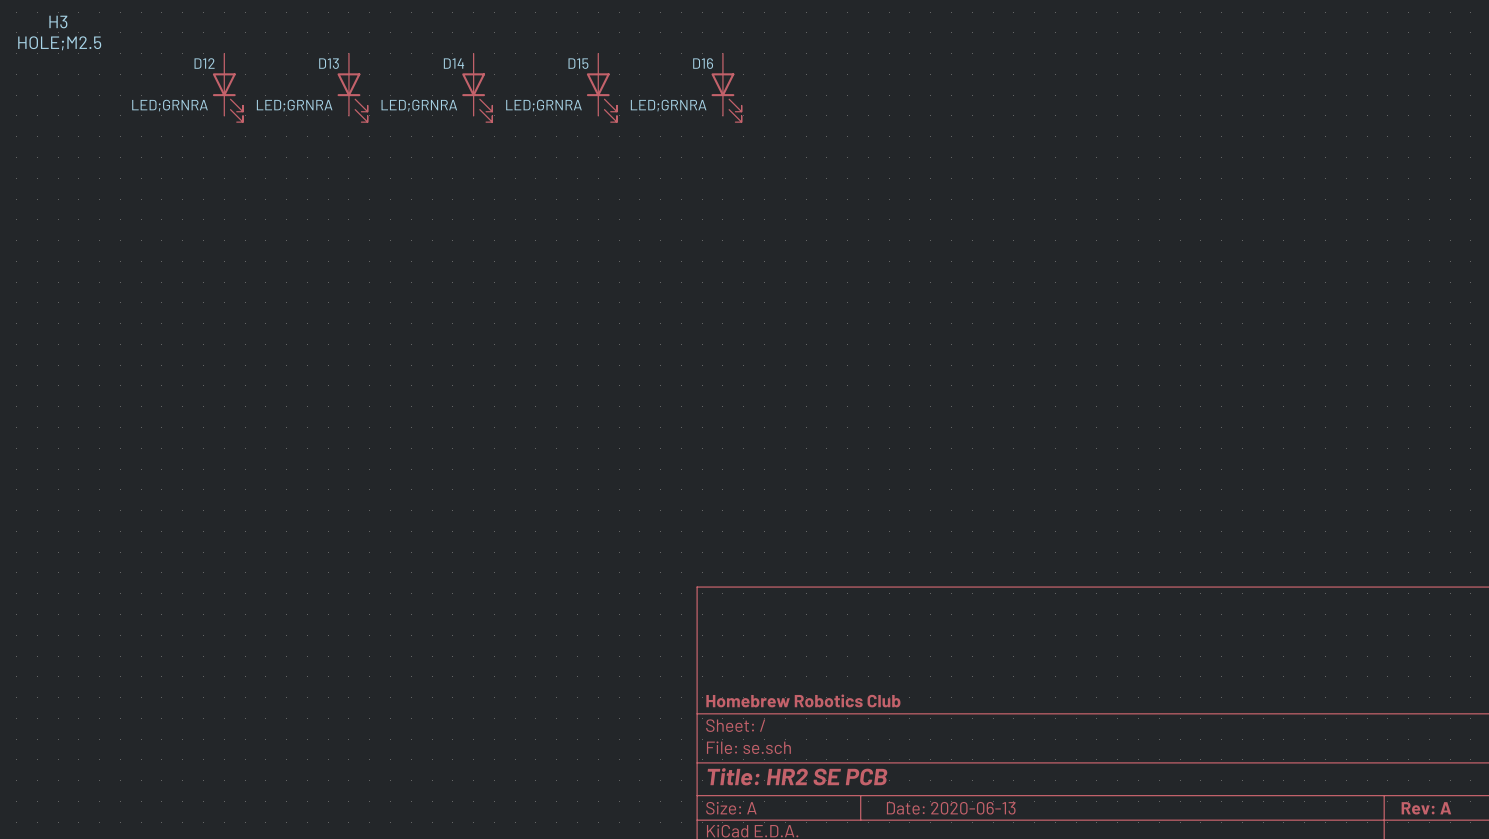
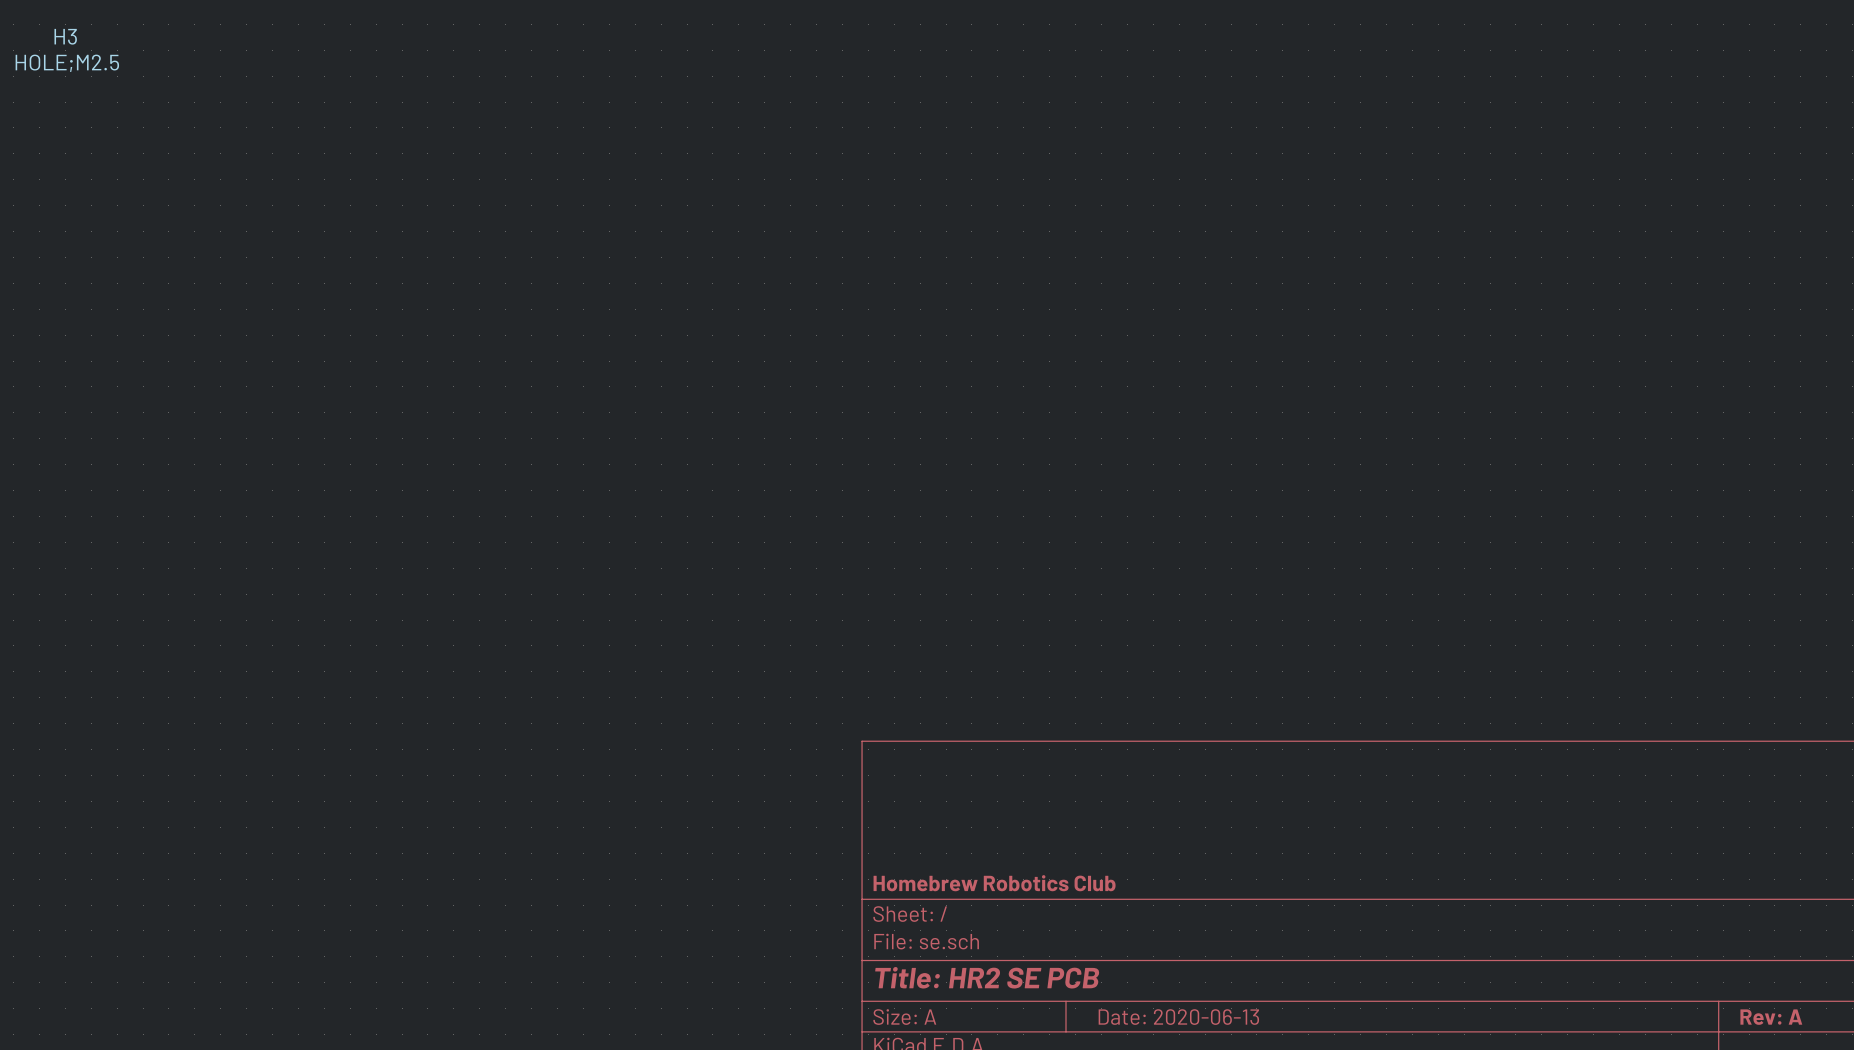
D12: LED;GRNRA (227, 87) -> none
D13: LED;GRNRA (352, 87) -> none
D14: LED;GRNRA (477, 87) -> none
D15: LED;GRNRA (601, 87) -> none
D16: LED;GRNRA (726, 87) -> none

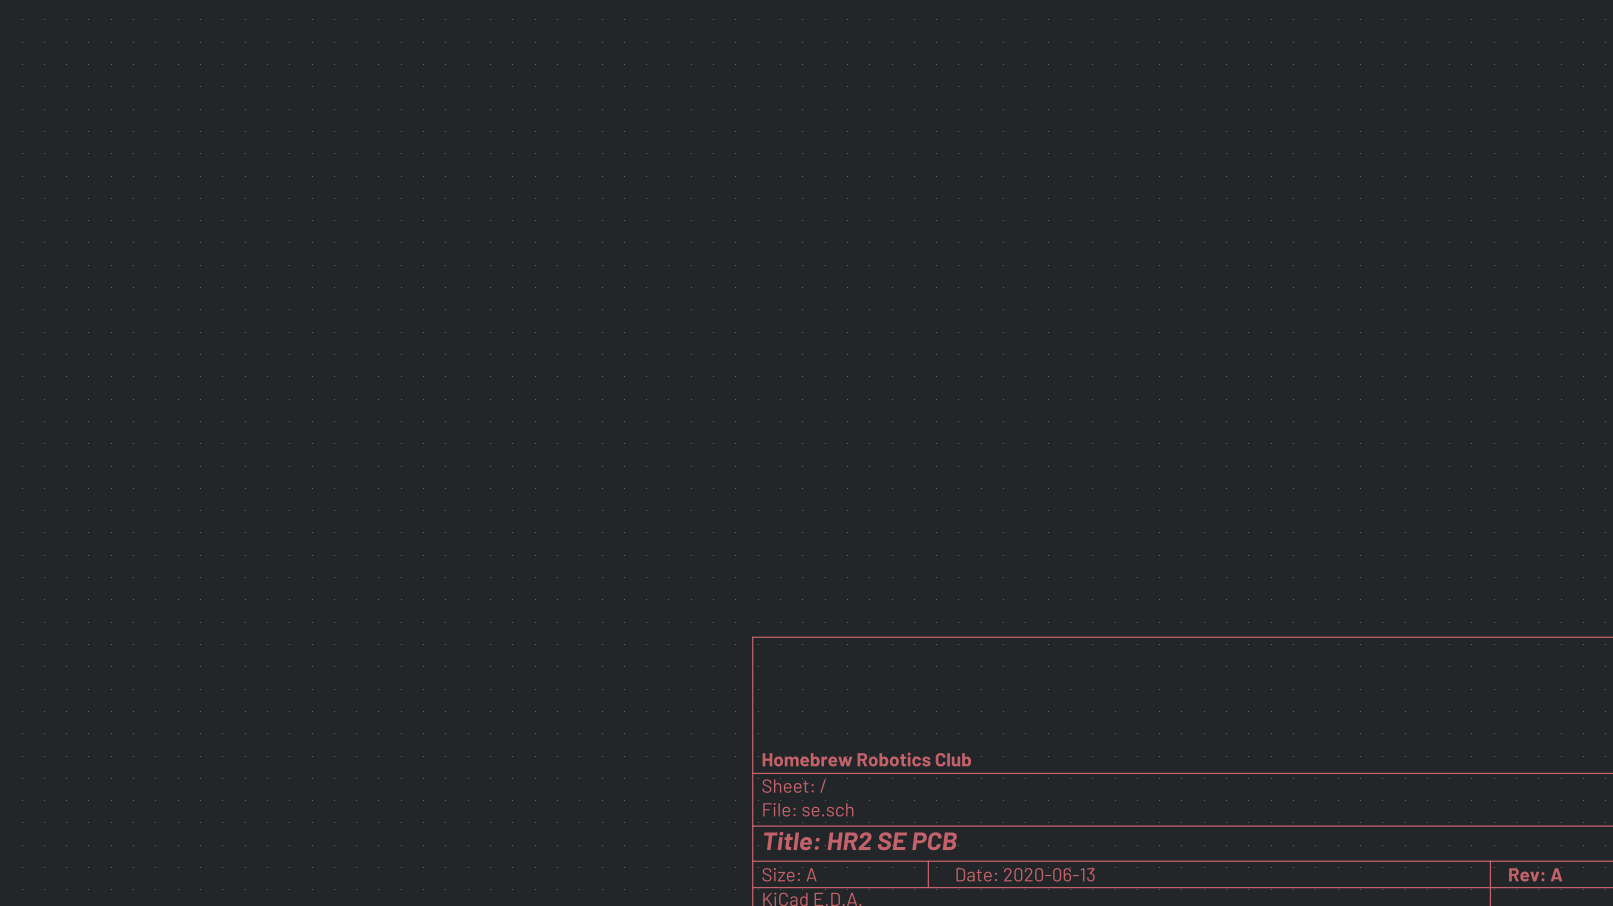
H3: HOLE;M2.5 (67, 50) -> none

